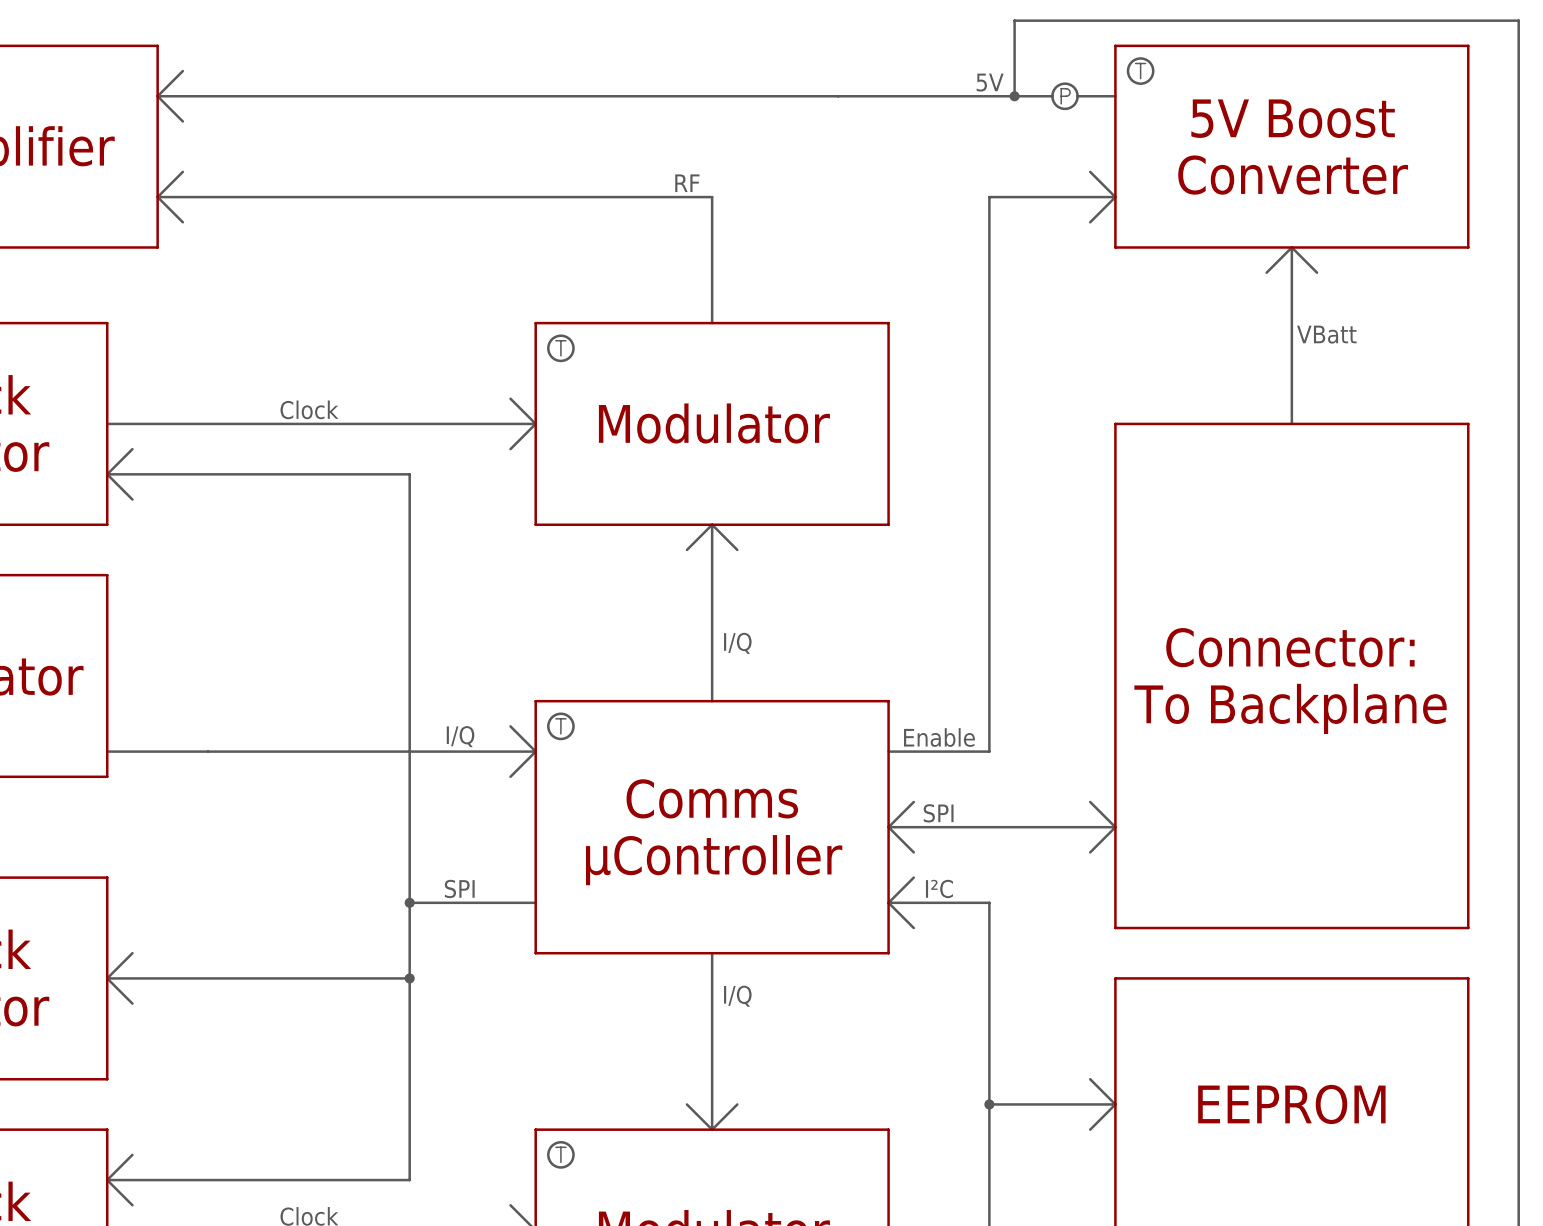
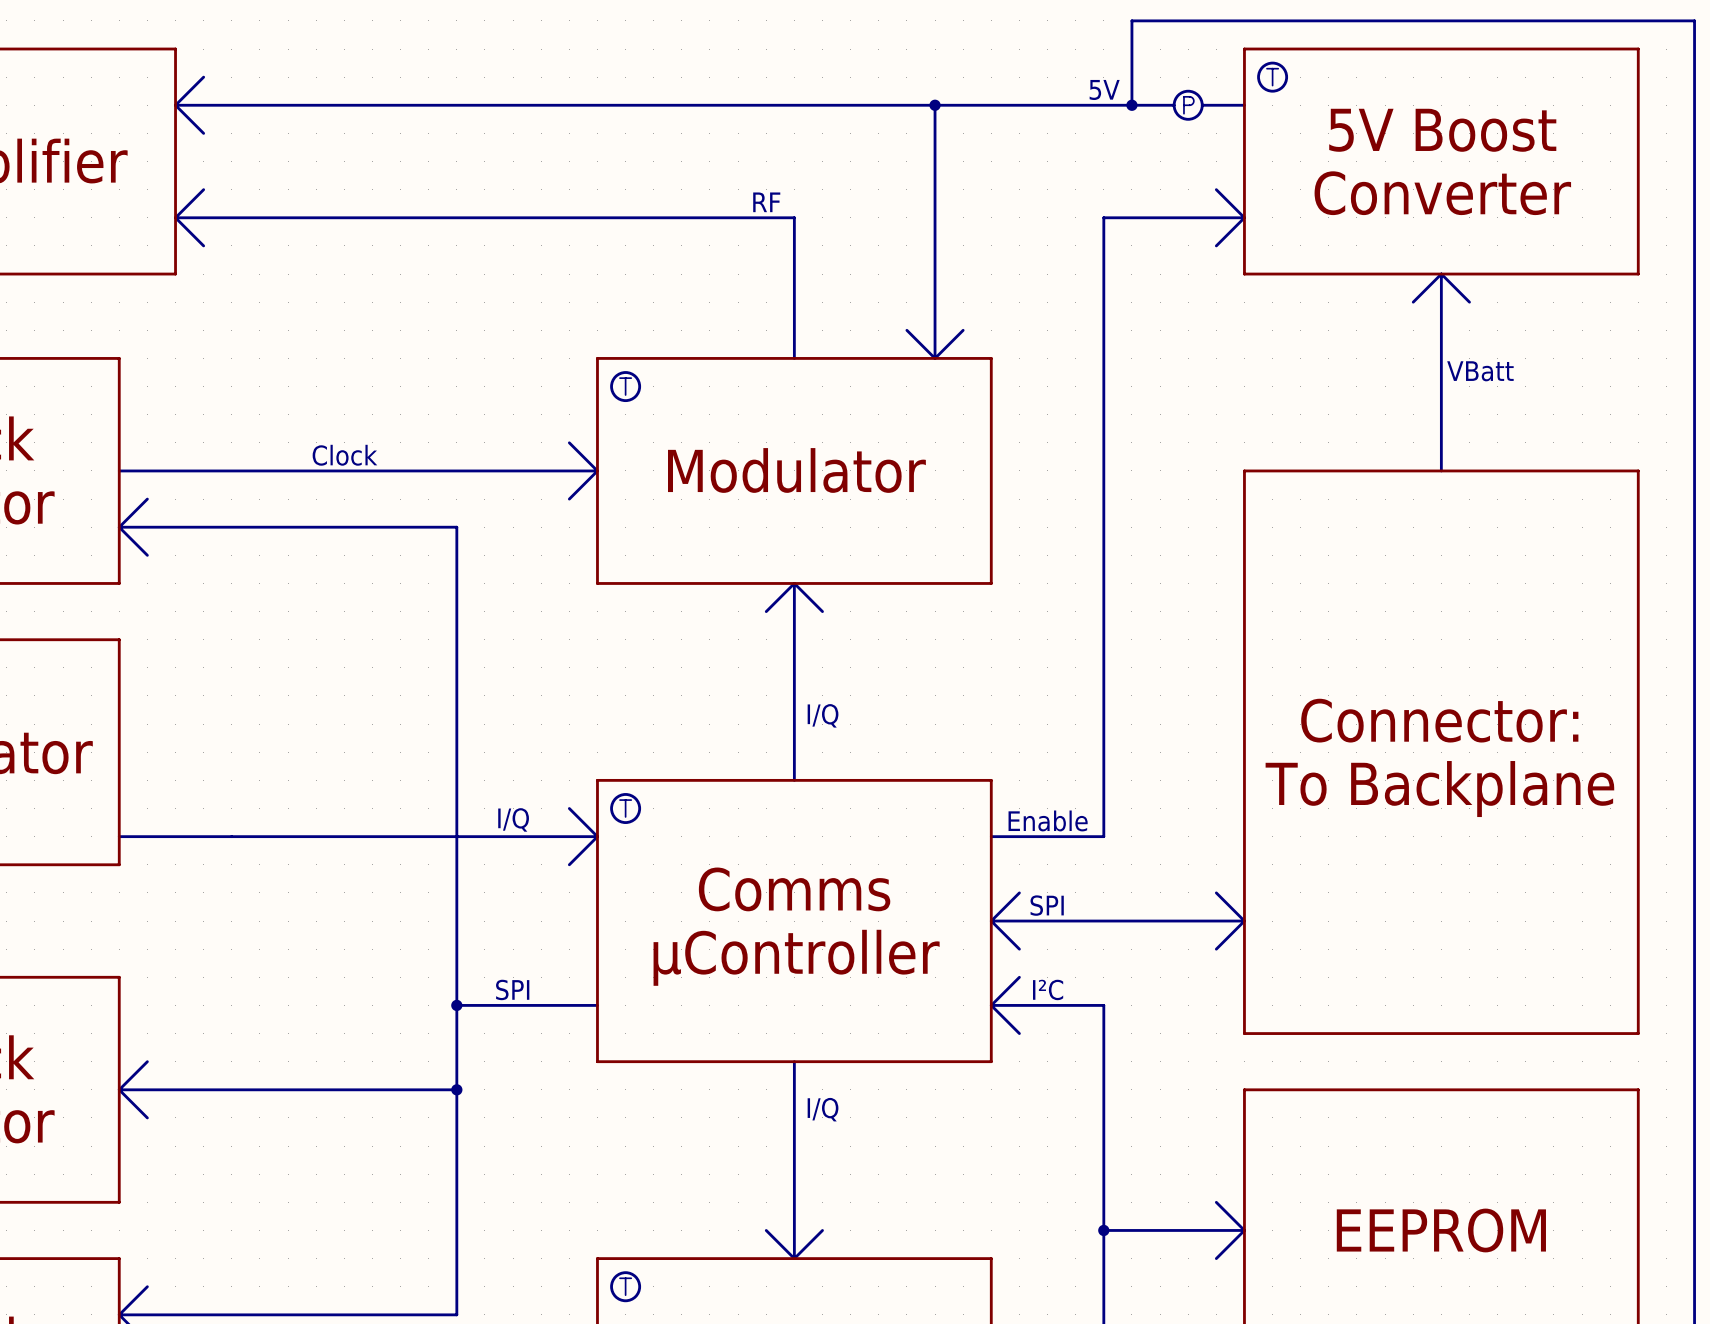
line: none -> (935, 105) (935, 358)
part: none -> (935, 105)
line: none -> (906, 330) (935, 358)
line: none -> (963, 330) (935, 358)

